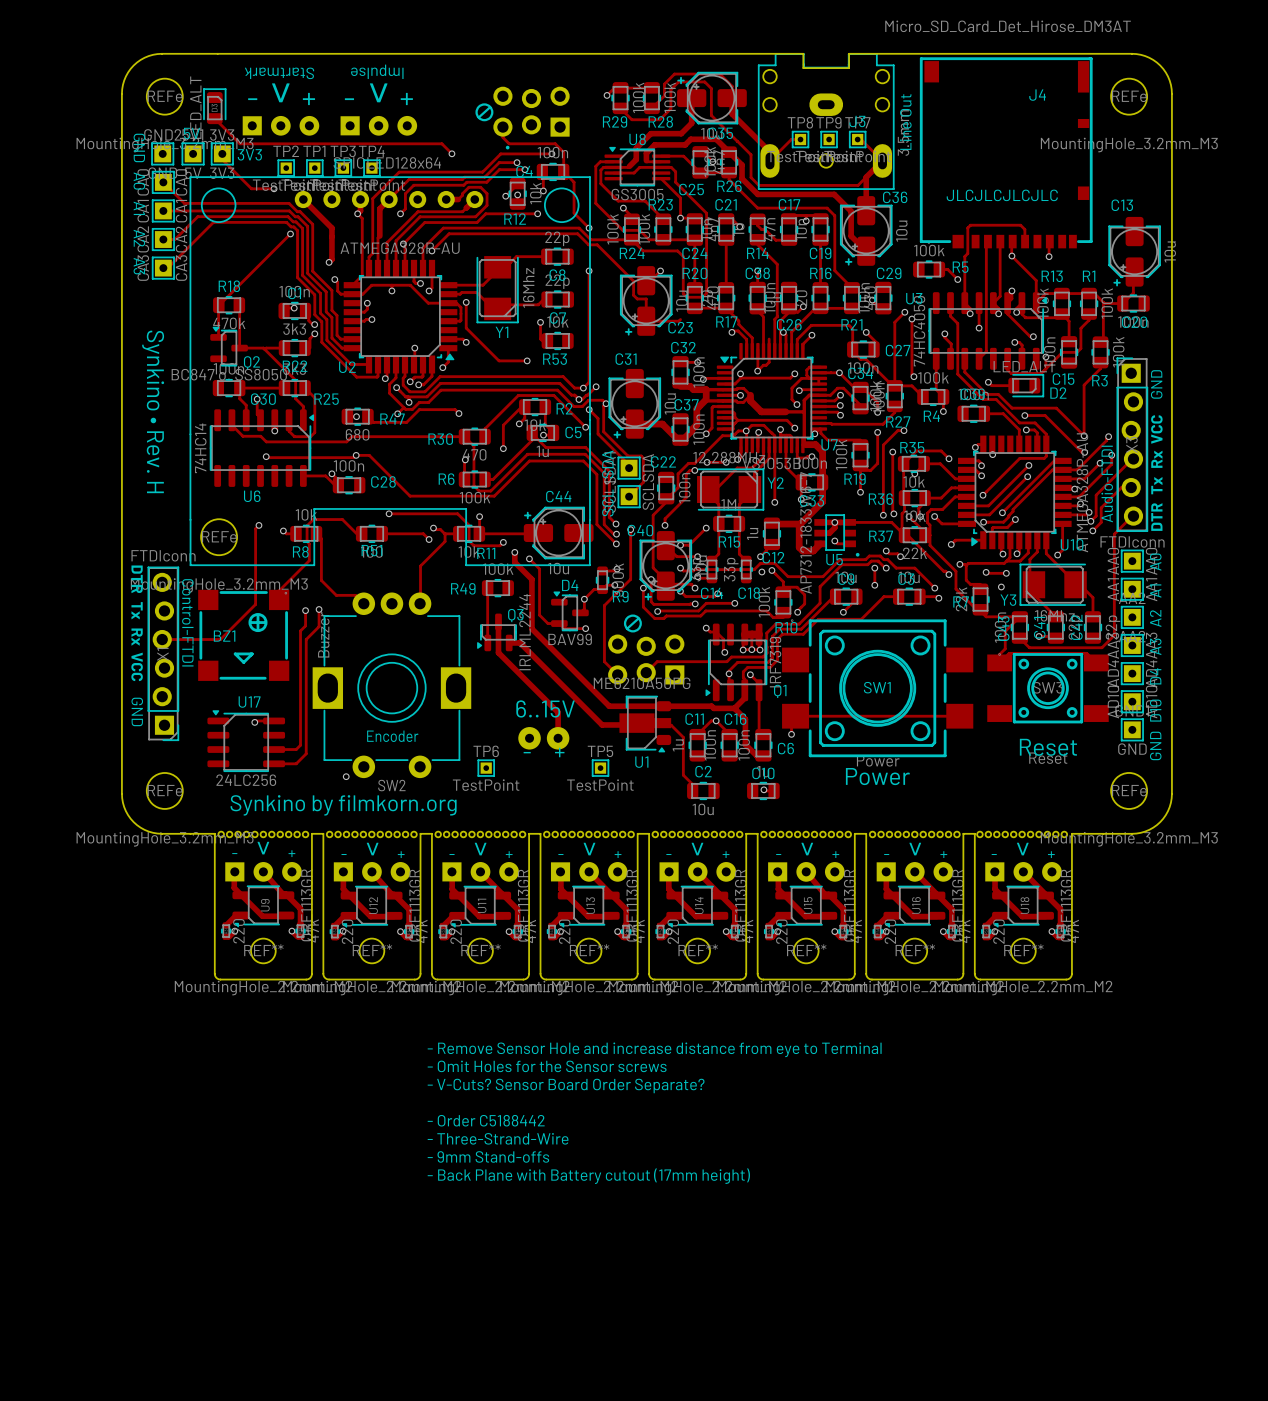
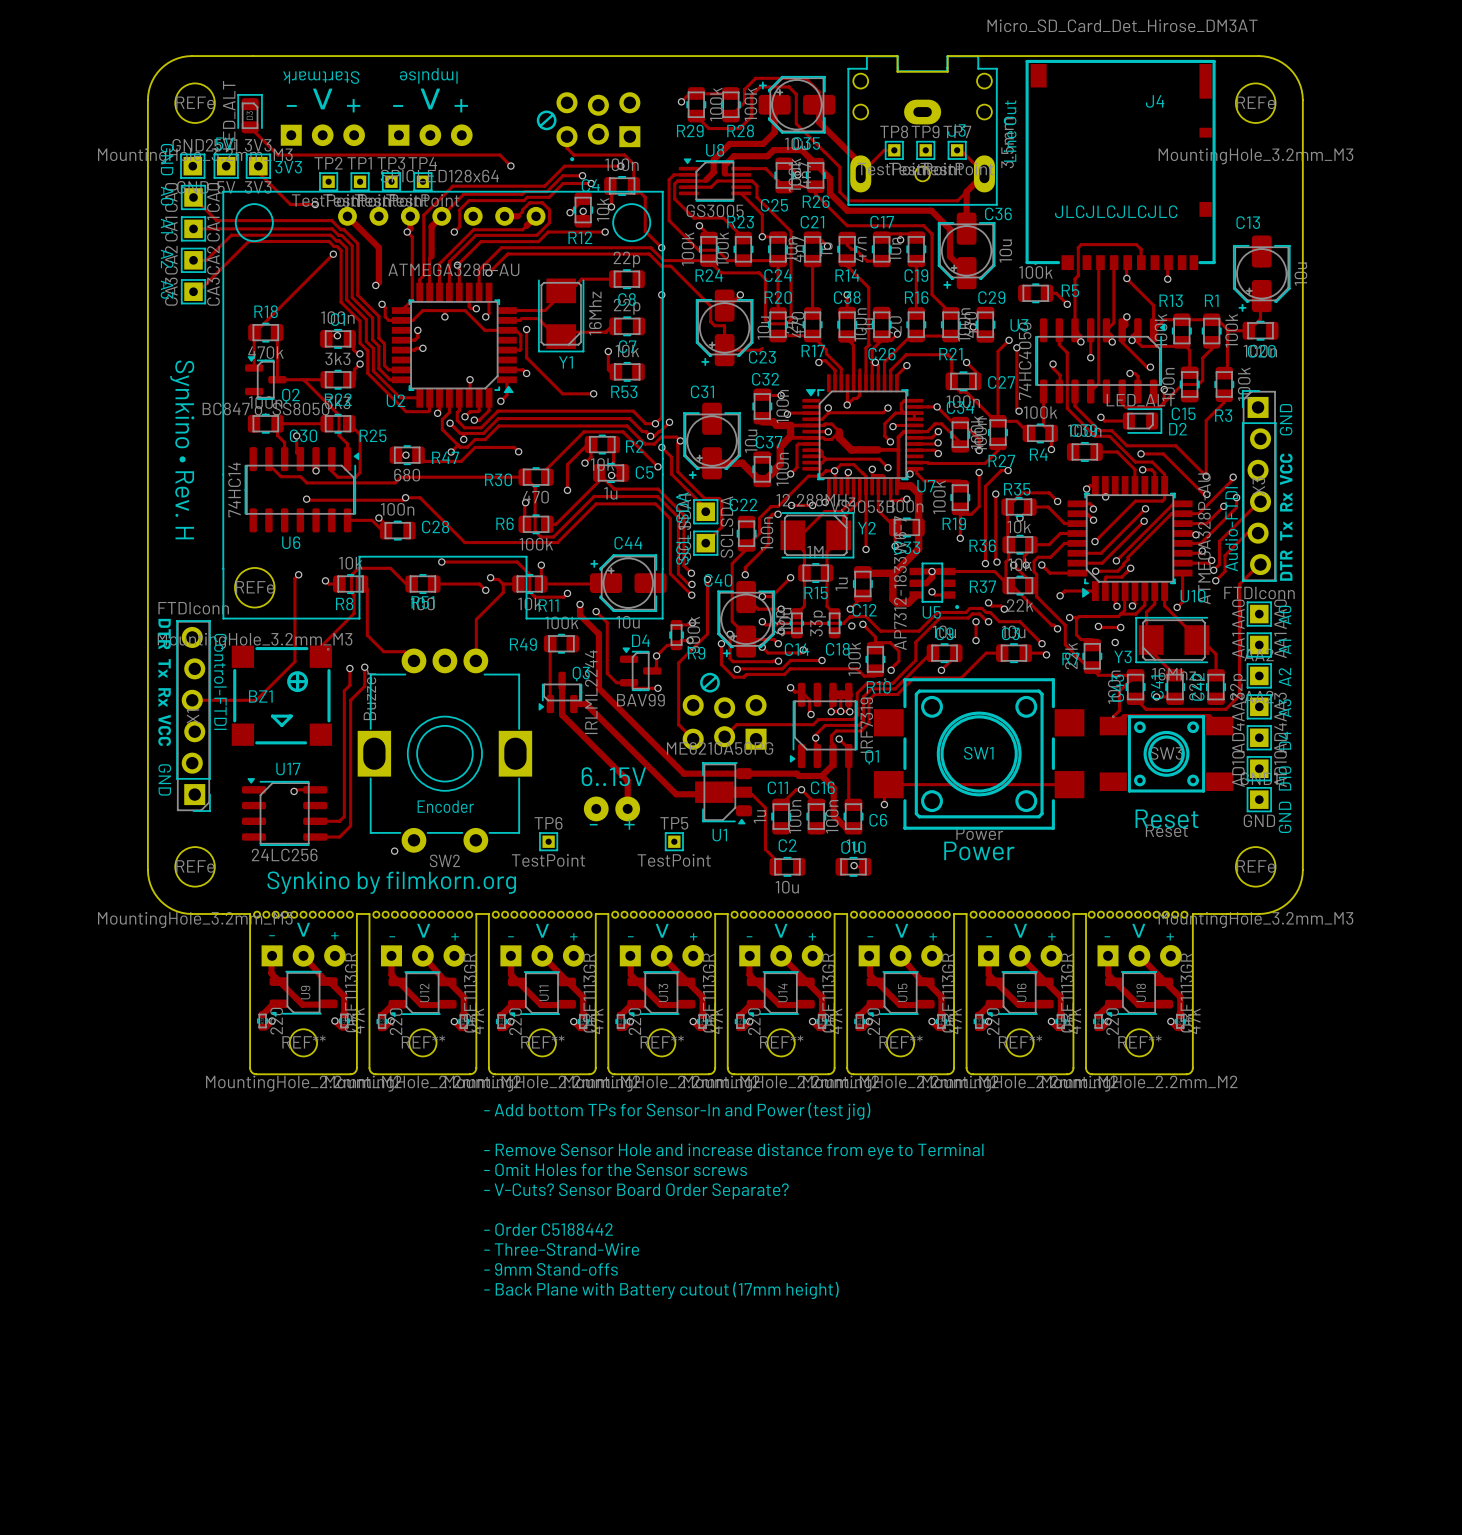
text: none -> - Add bottom TPs for Sensor-In and Power (test jig) (677, 1111)

